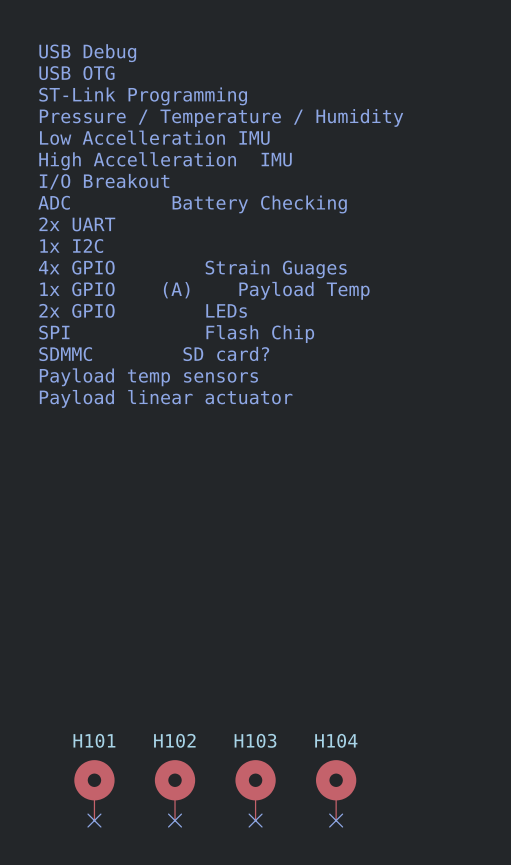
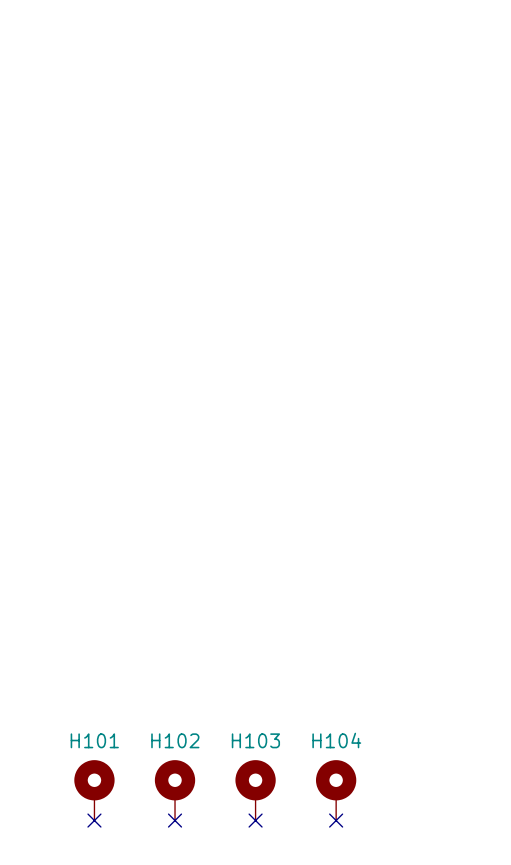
text: USB Debug (87, 53) -> none
text: USB OTG (76, 73) -> none
text: ST-Link Programming (143, 96) -> none
text: Pressure / Temperature / Humidity (221, 117) -> none
text: Low Accelleration IMU (154, 137) -> none
text: High Accelleration IMU (165, 161) -> none
text: I/O Breakout (104, 181) -> none
text: ADC Battery Checking (192, 204) -> none
text: 2x UART (77, 224) -> none
text: 1x I2C (71, 246) -> none
text: 4x GPIO Strain Guages (192, 269) -> none
text: 1x GPIO (A) Payload Temp (204, 290) -> none
text: 2x GPIO LEDs (143, 310) -> none
text: SPI Flash Chip (176, 334) -> none
text: SDMMC SD card? (154, 353) -> none
text: Payload temp sensors (148, 377) -> none
text: Payload linear actuator (166, 398) -> none

